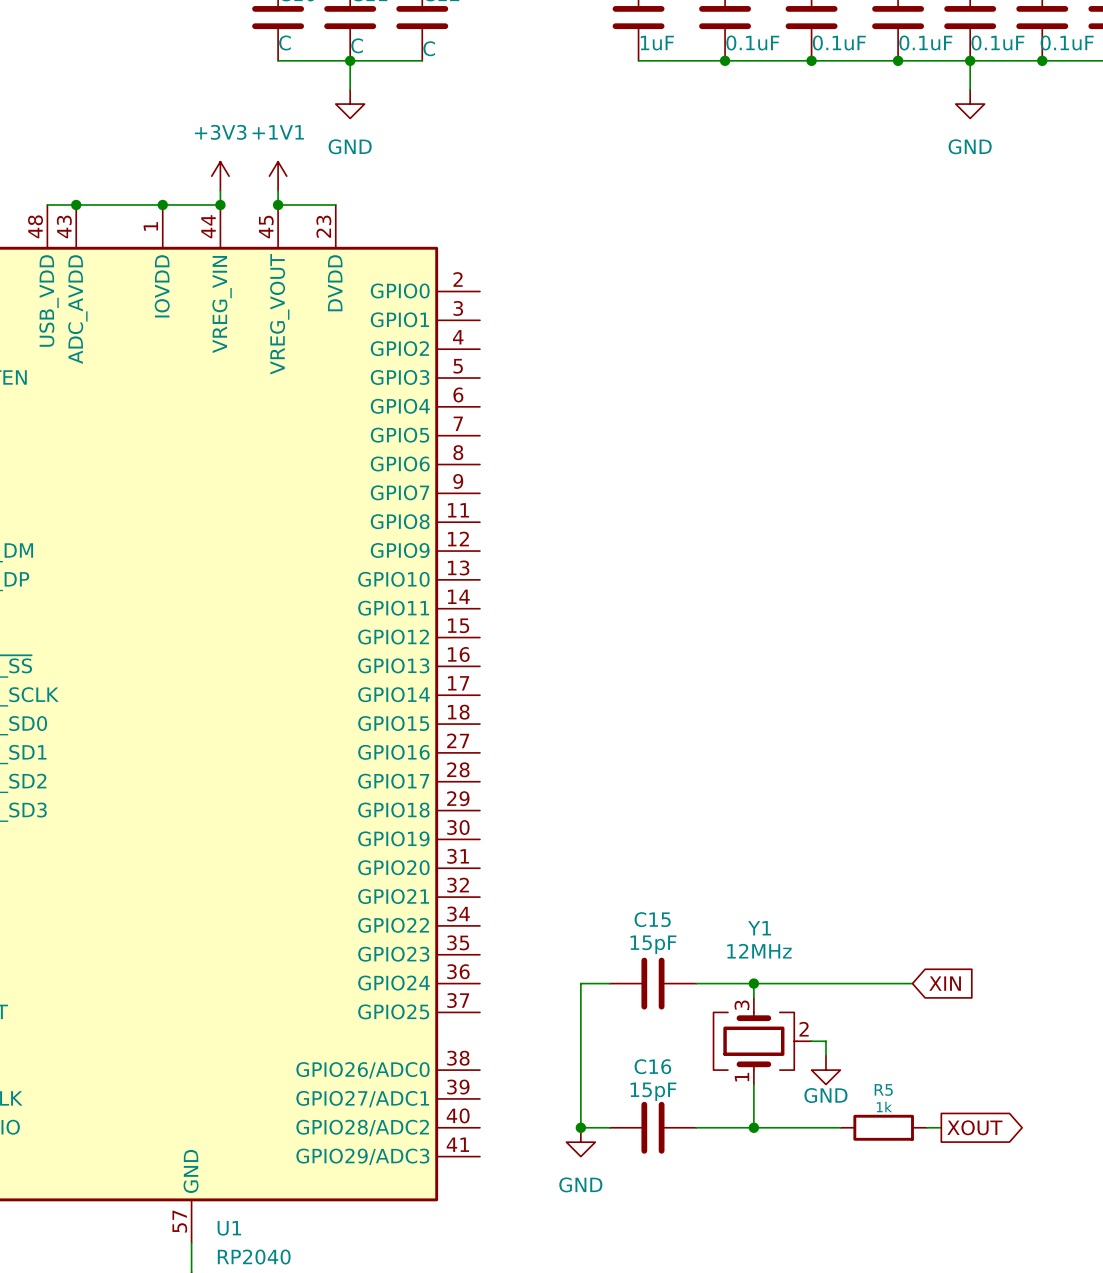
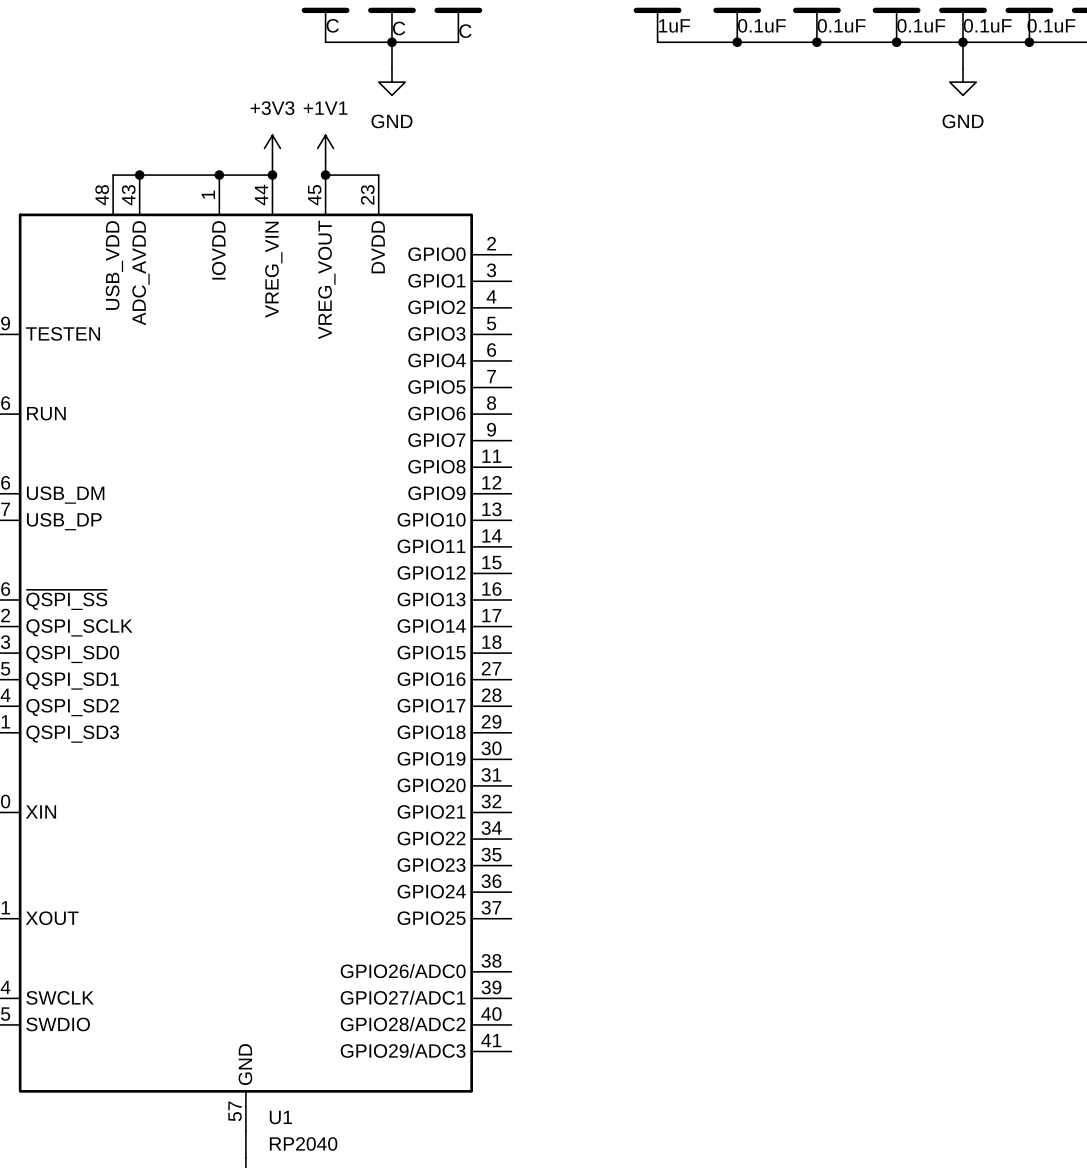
wire: (609, 983) (580, 983) (580, 1127) (609, 1127) -> none
C15: 15pF (652, 983) -> none
wire: (696, 983) (912, 983) -> none
wire: (753, 983) (753, 998) -> none
junction: (753, 983) -> none
global label: XIN (945, 983) -> none
Y1: 12MHz (762, 1041) -> none
wire: (811, 1041) (825, 1041) (825, 1055) -> none
power symbol: GND (825, 1070) -> none
wire: (753, 1084) (753, 1127) -> none
junction: (580, 1127) -> none
C16: 15pF (652, 1127) -> none
wire: (696, 1127) (840, 1127) -> none
junction: (753, 1127) -> none
R5: 1k (883, 1127) -> none
wire: (926, 1127) (941, 1127) -> none
global label: XOUT (974, 1127) -> none
power symbol: GND (580, 1142) -> none

